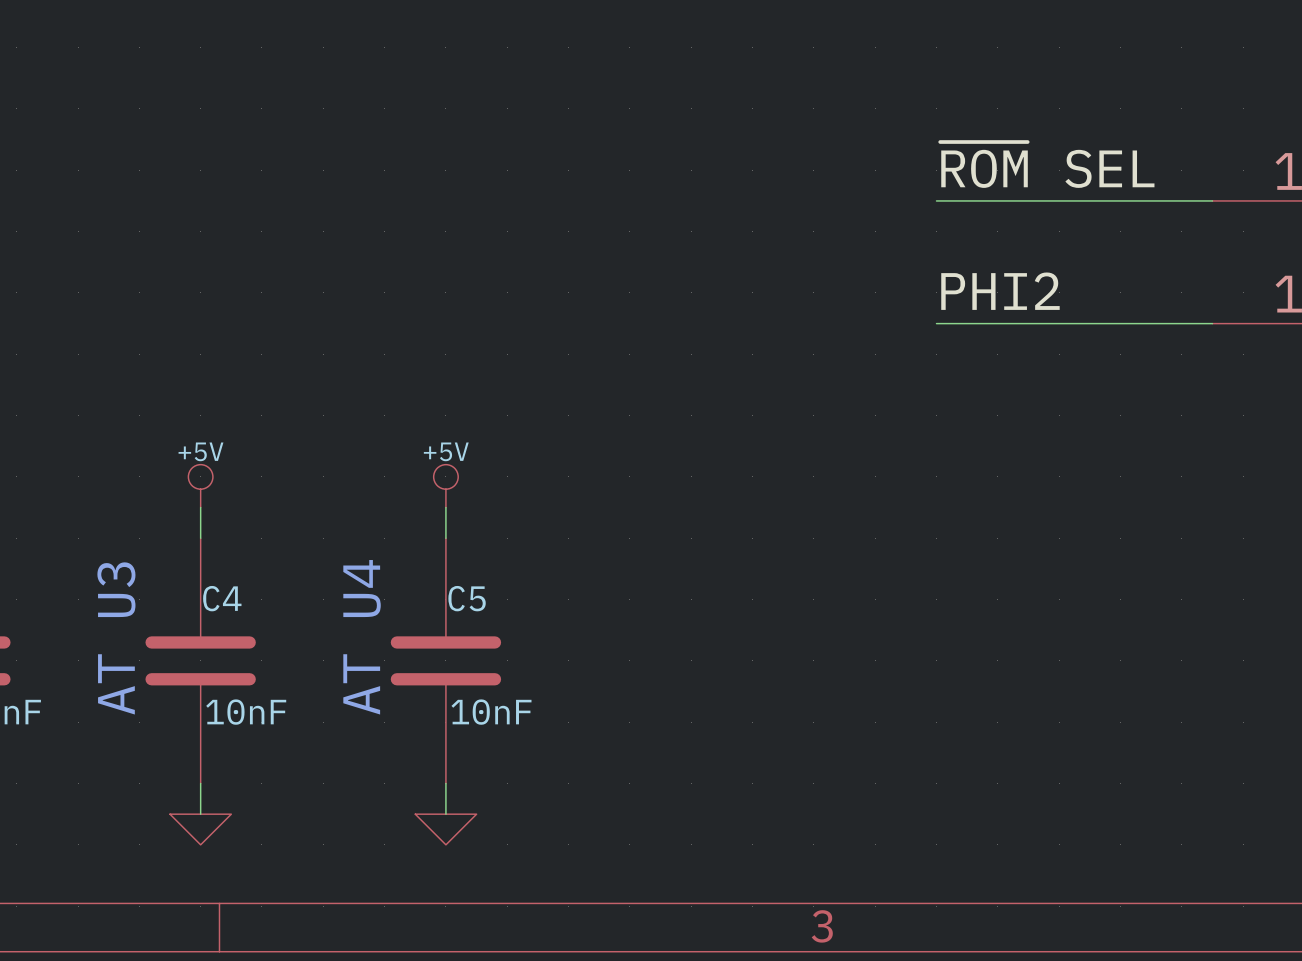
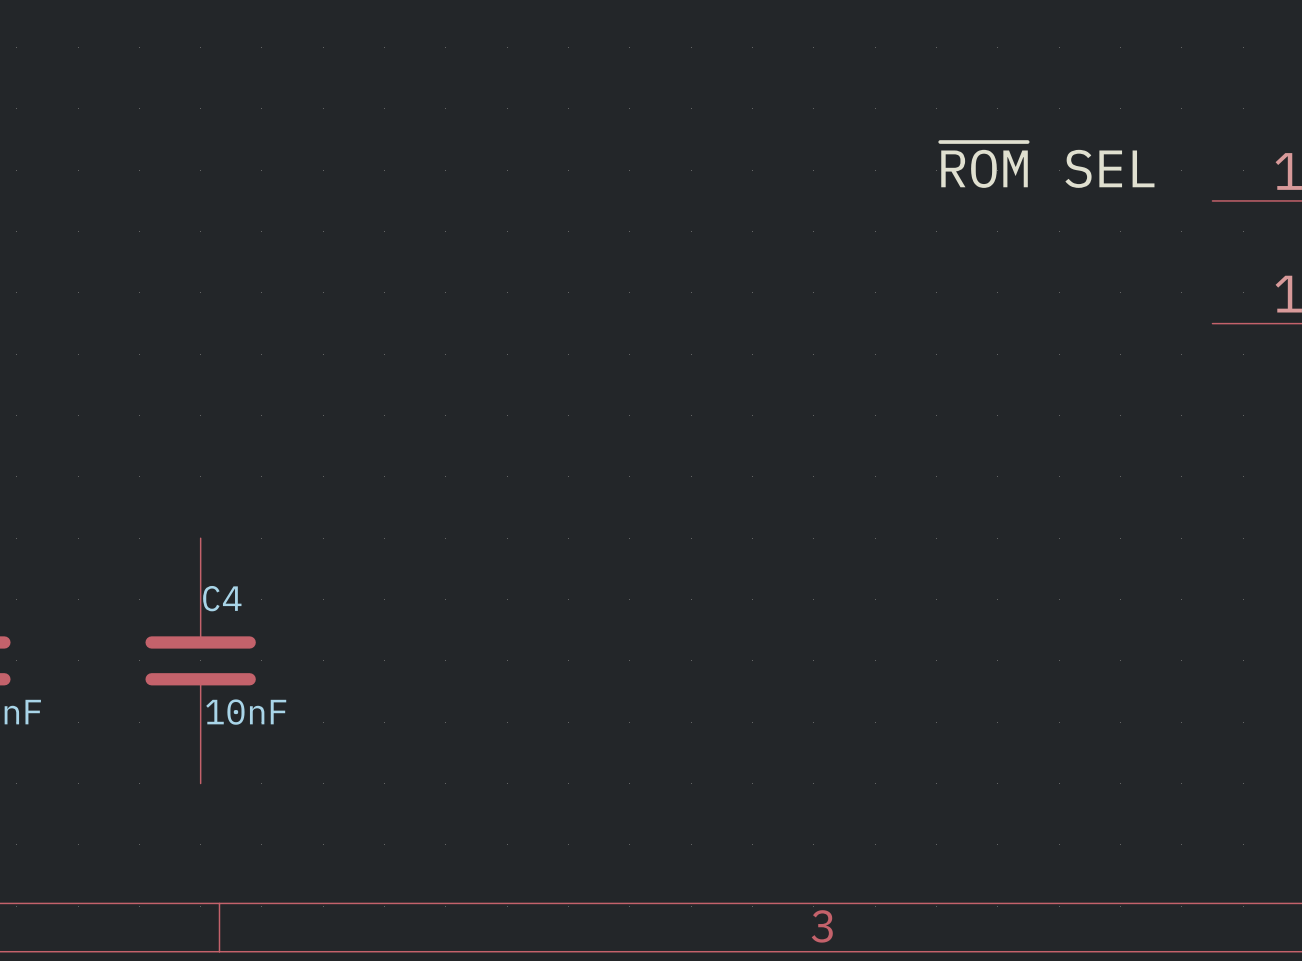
wire: (936, 200) (1212, 200) -> none
label: PHI2 (1000, 291) -> none
wire: (936, 323) (1212, 323) -> none
power symbol: +5V (200, 486) -> none
power symbol: +5V (445, 486) -> none
wire: (200, 507) (200, 538) -> none
wire: (445, 507) (445, 538) -> none
text: AT U4 (362, 637) -> none
text: AT U3 (116, 638) -> none
C5: 10nF (445, 660) -> none
wire: (200, 783) (200, 814) -> none
wire: (445, 783) (445, 814) -> none
power symbol: (200, 829) -> none
power symbol: (445, 829) -> none

